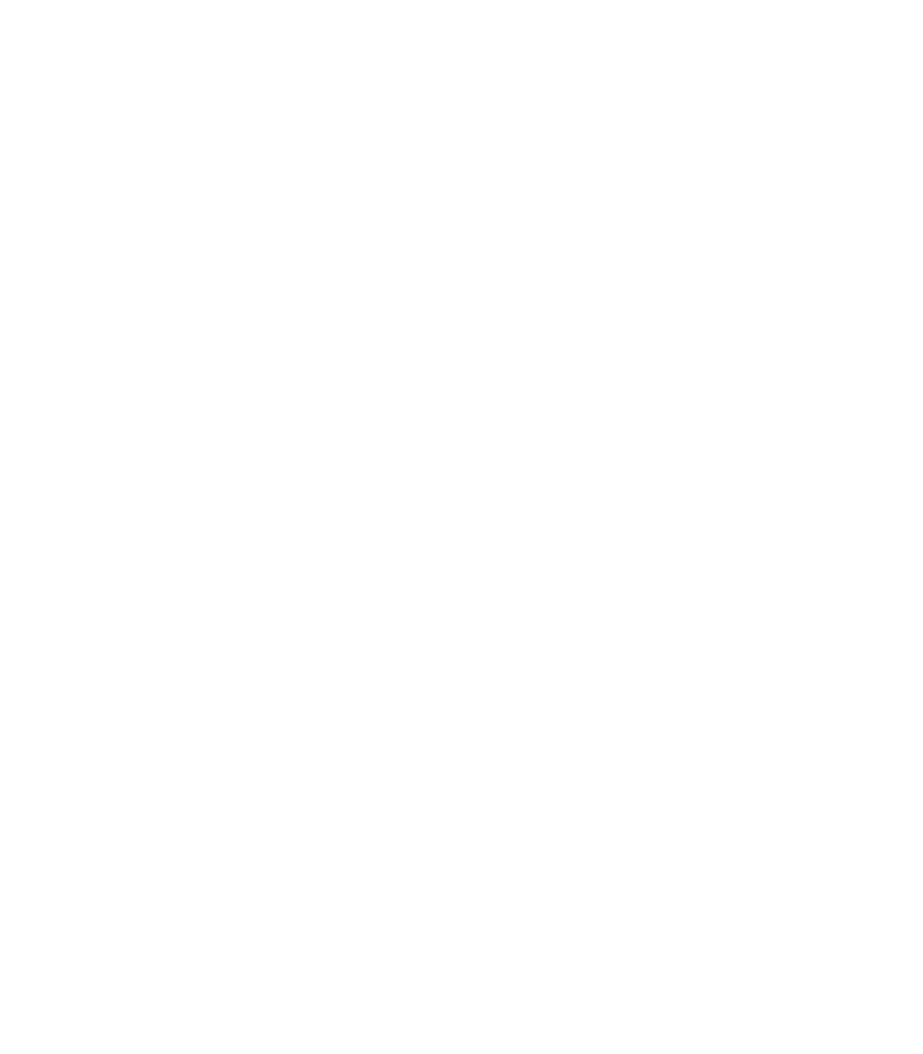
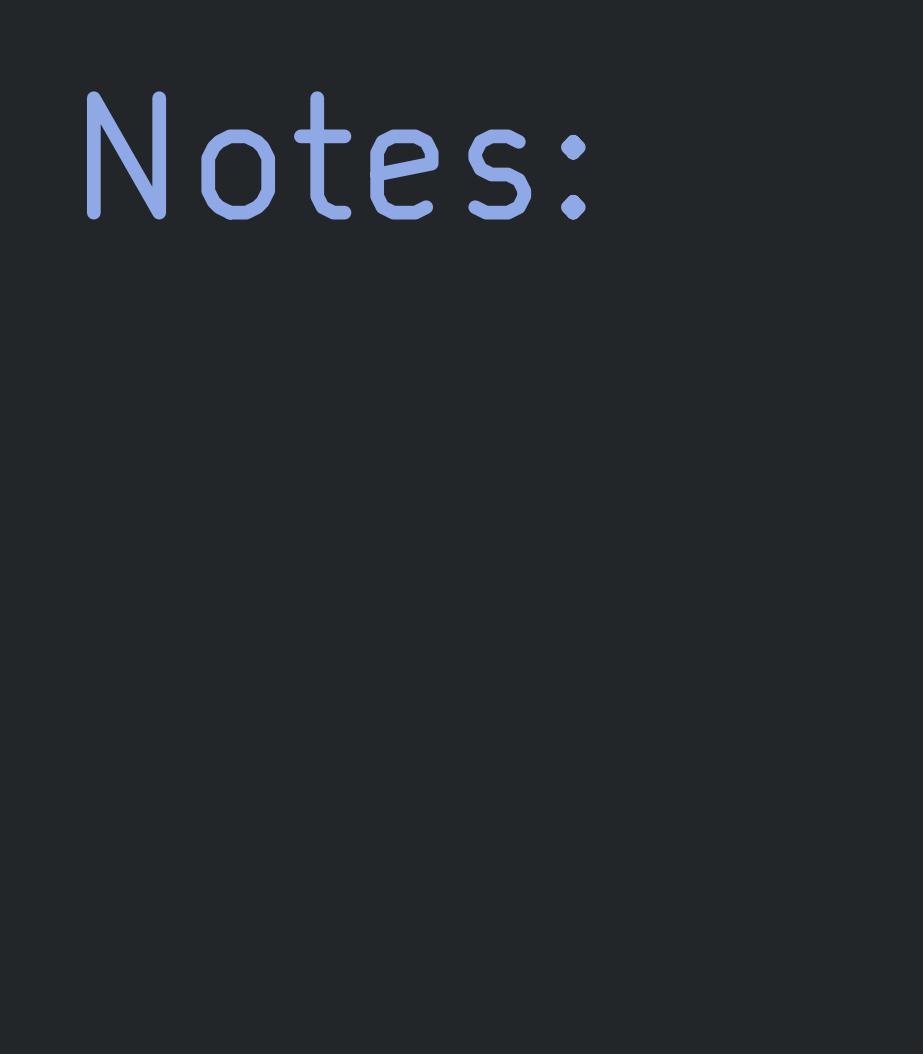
text: none -> Notes: (336, 155)

